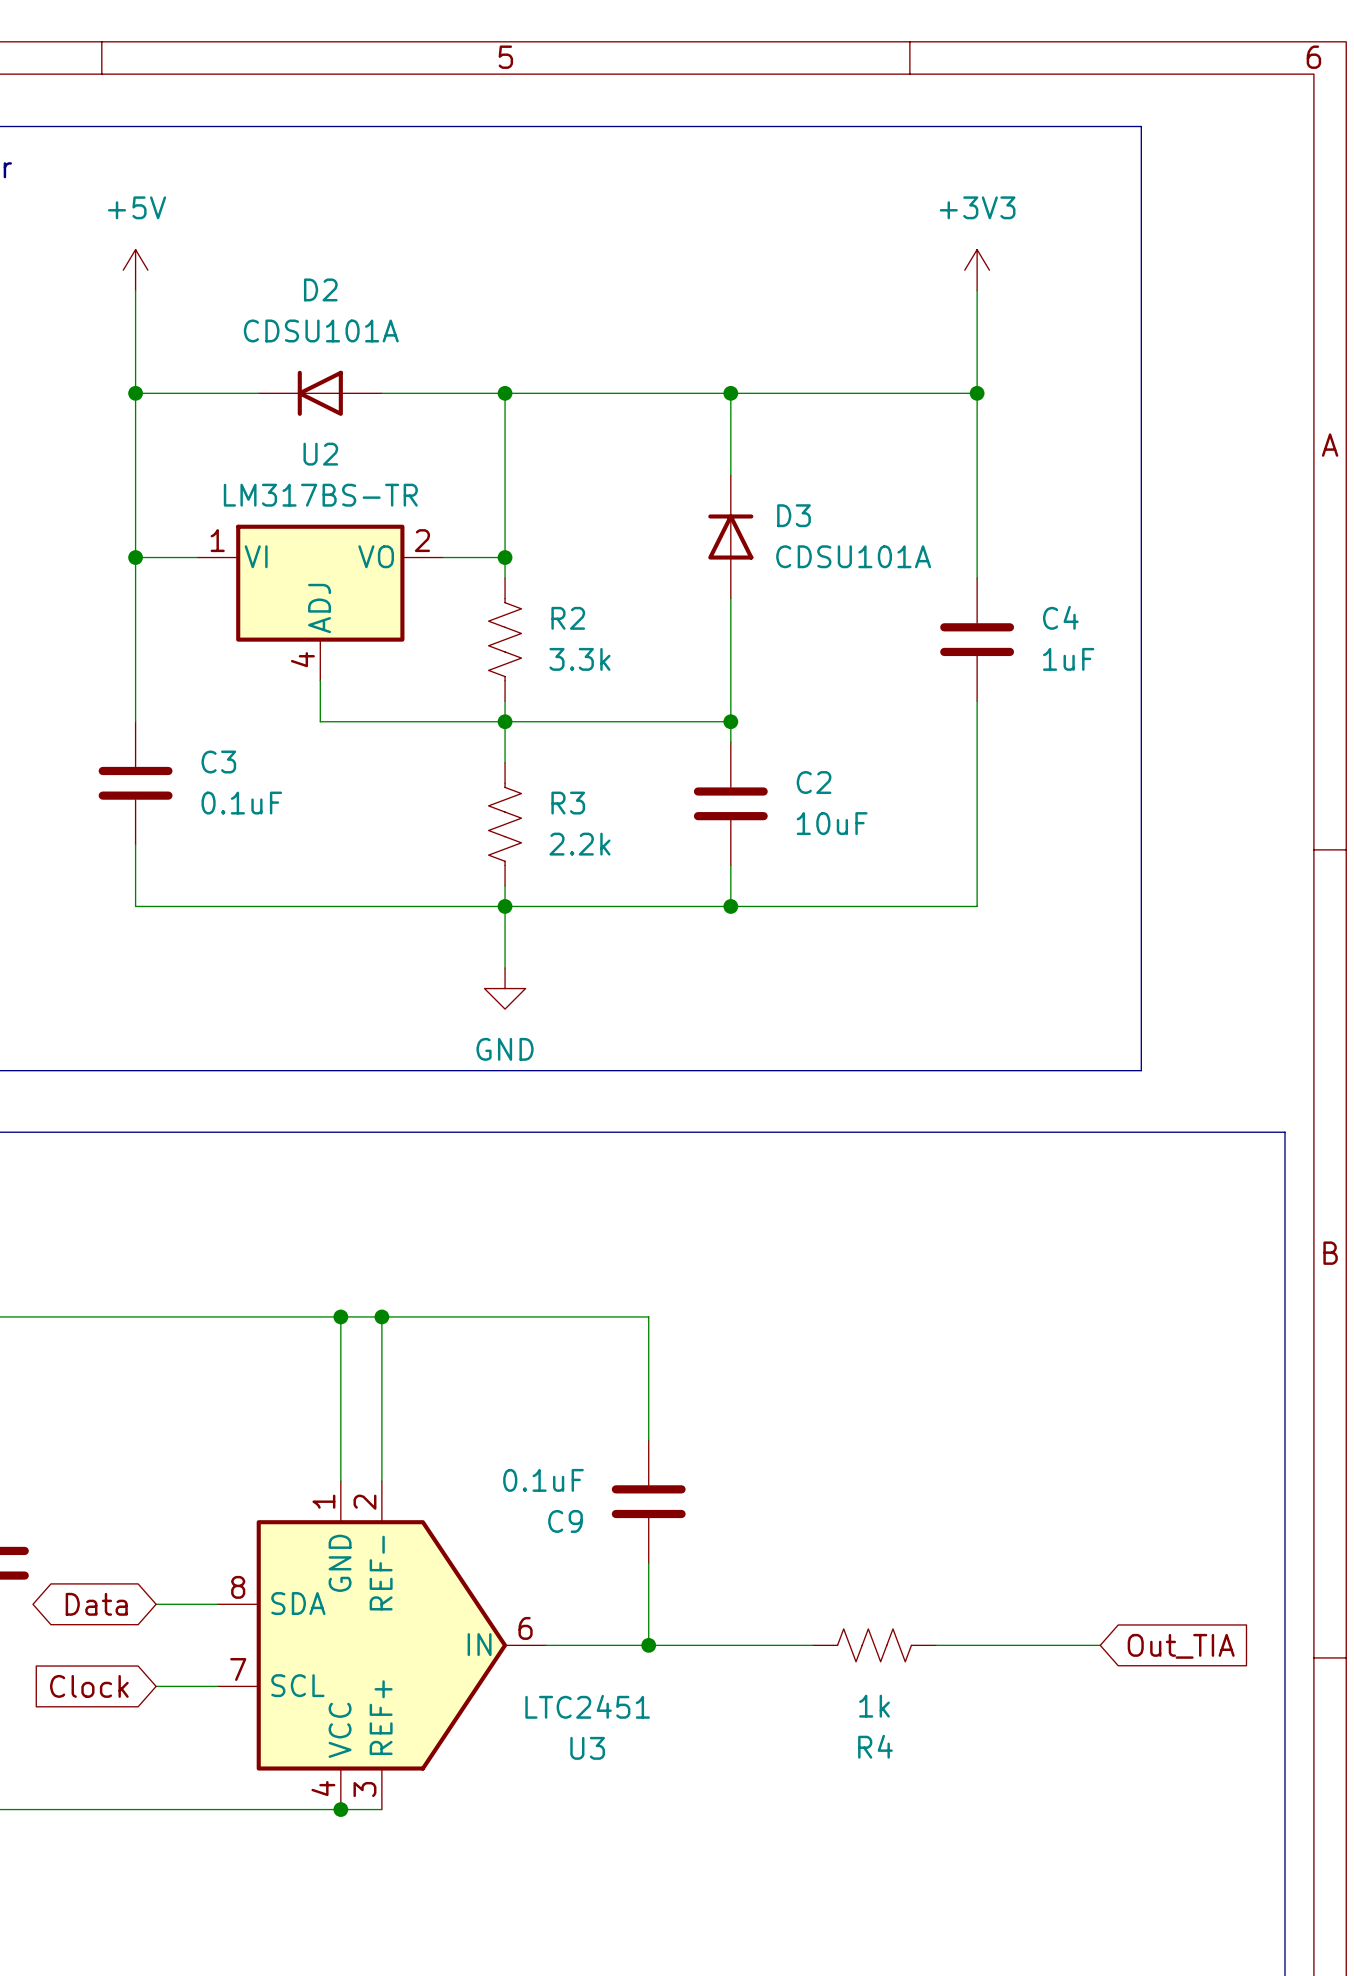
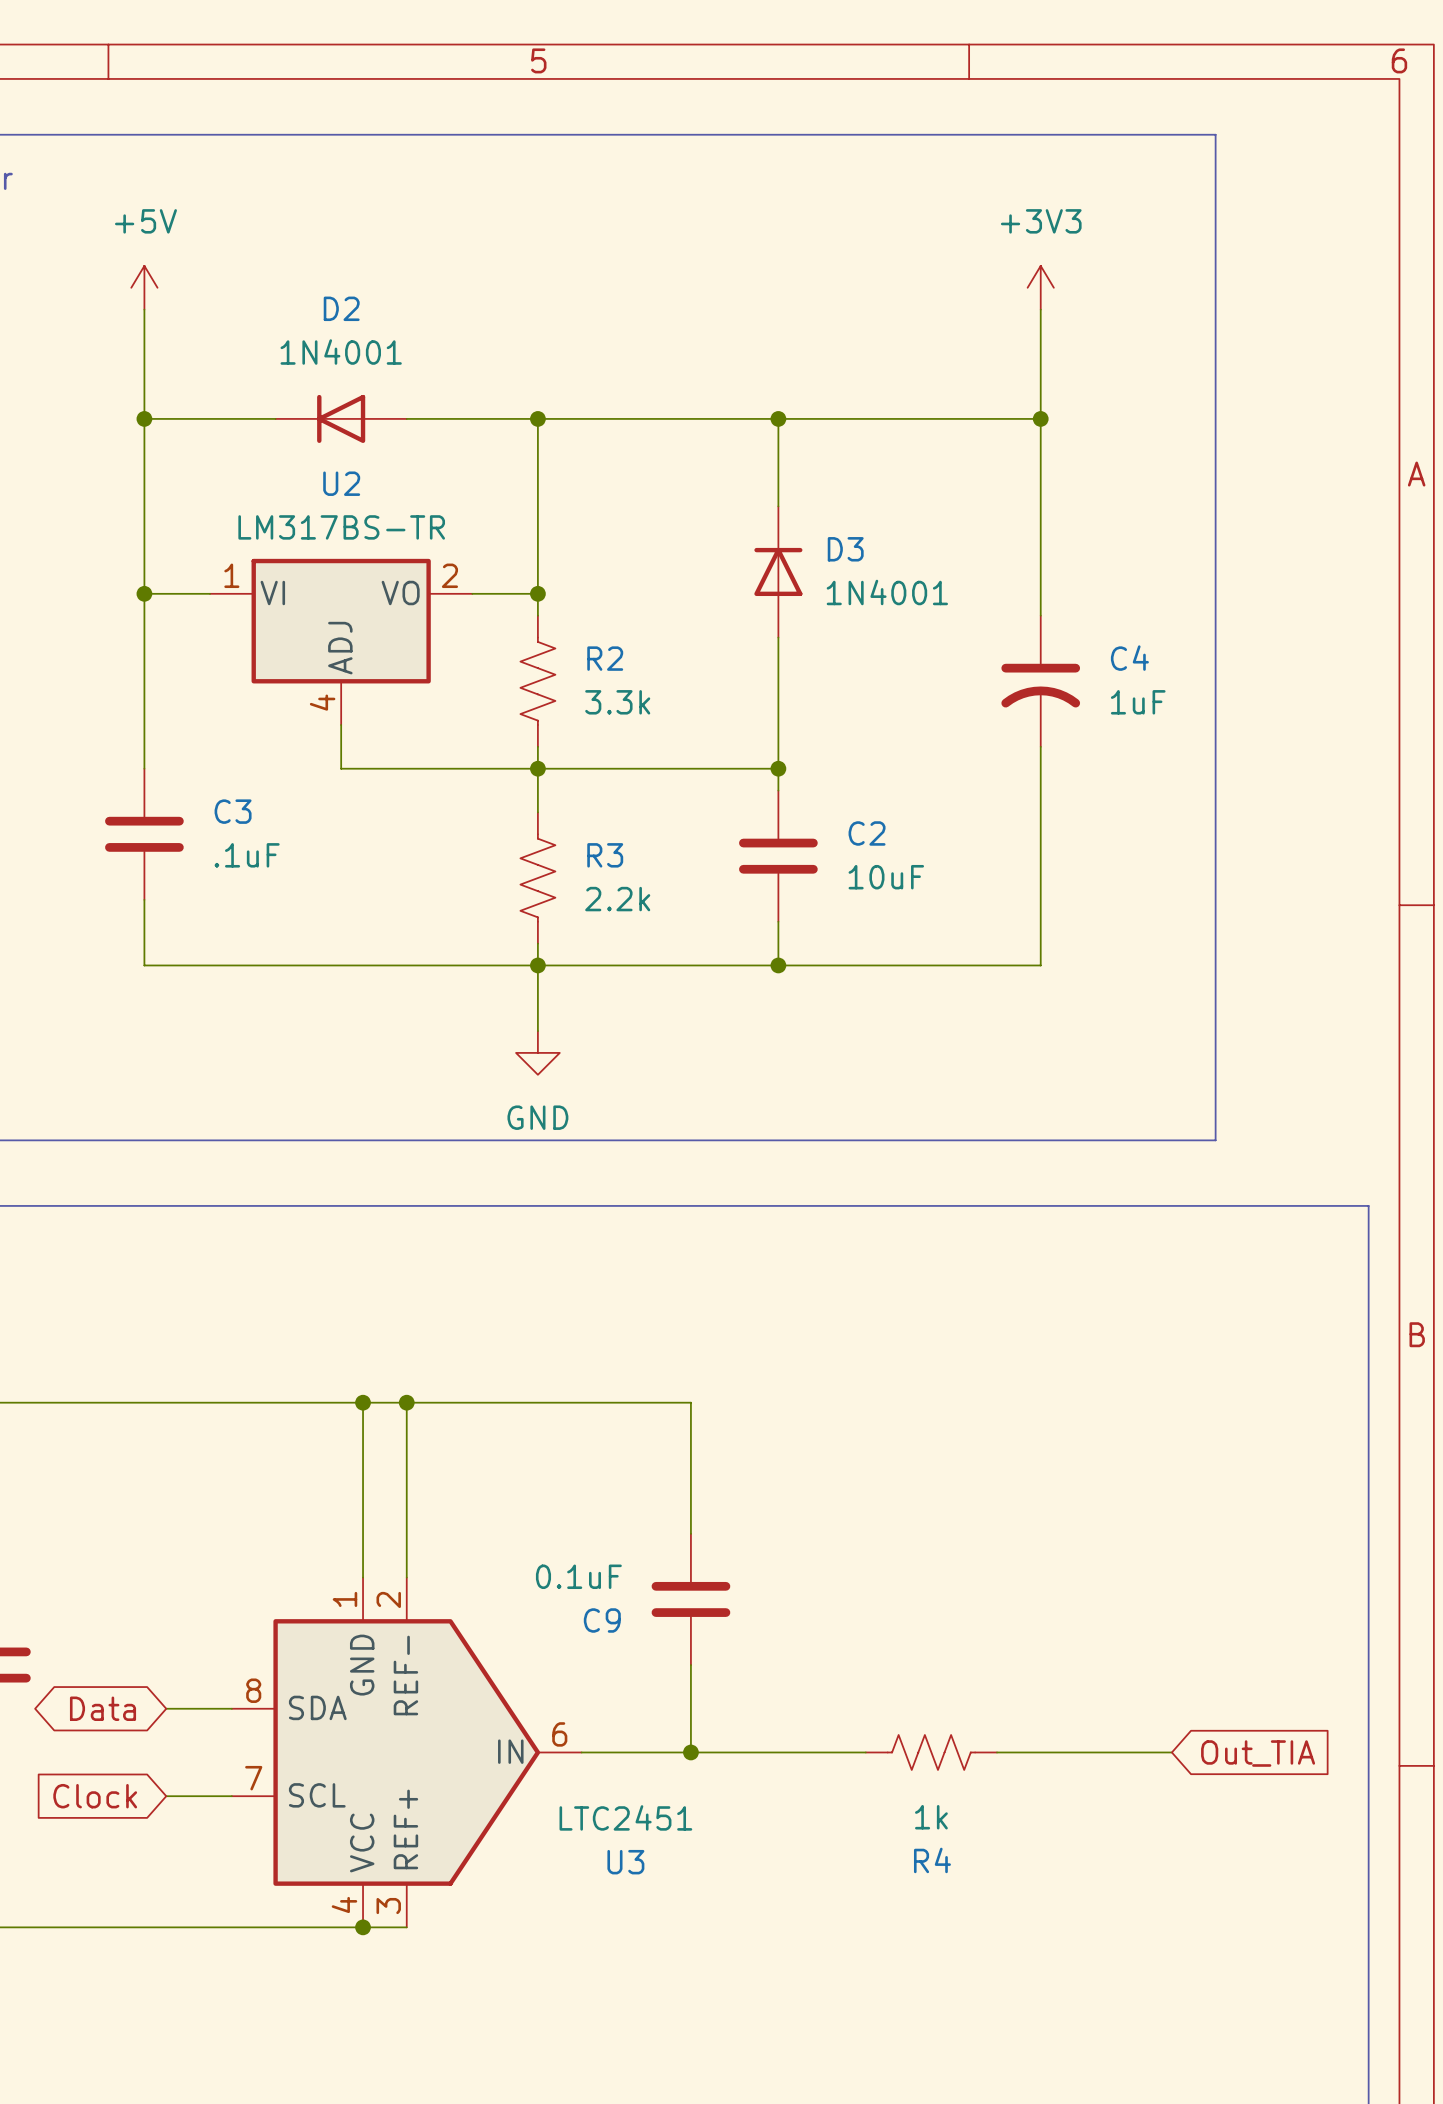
D2 value: CDSU101A (321, 330) -> 1N4001 (341, 352)
D3 value: CDSU101A (853, 556) -> 1N4001 (887, 592)
C4 symbol: [940, 578, 1015, 702] -> [1001, 615, 1081, 747]
C3 value: 0.1uF (241, 803) -> .1uF (247, 855)

